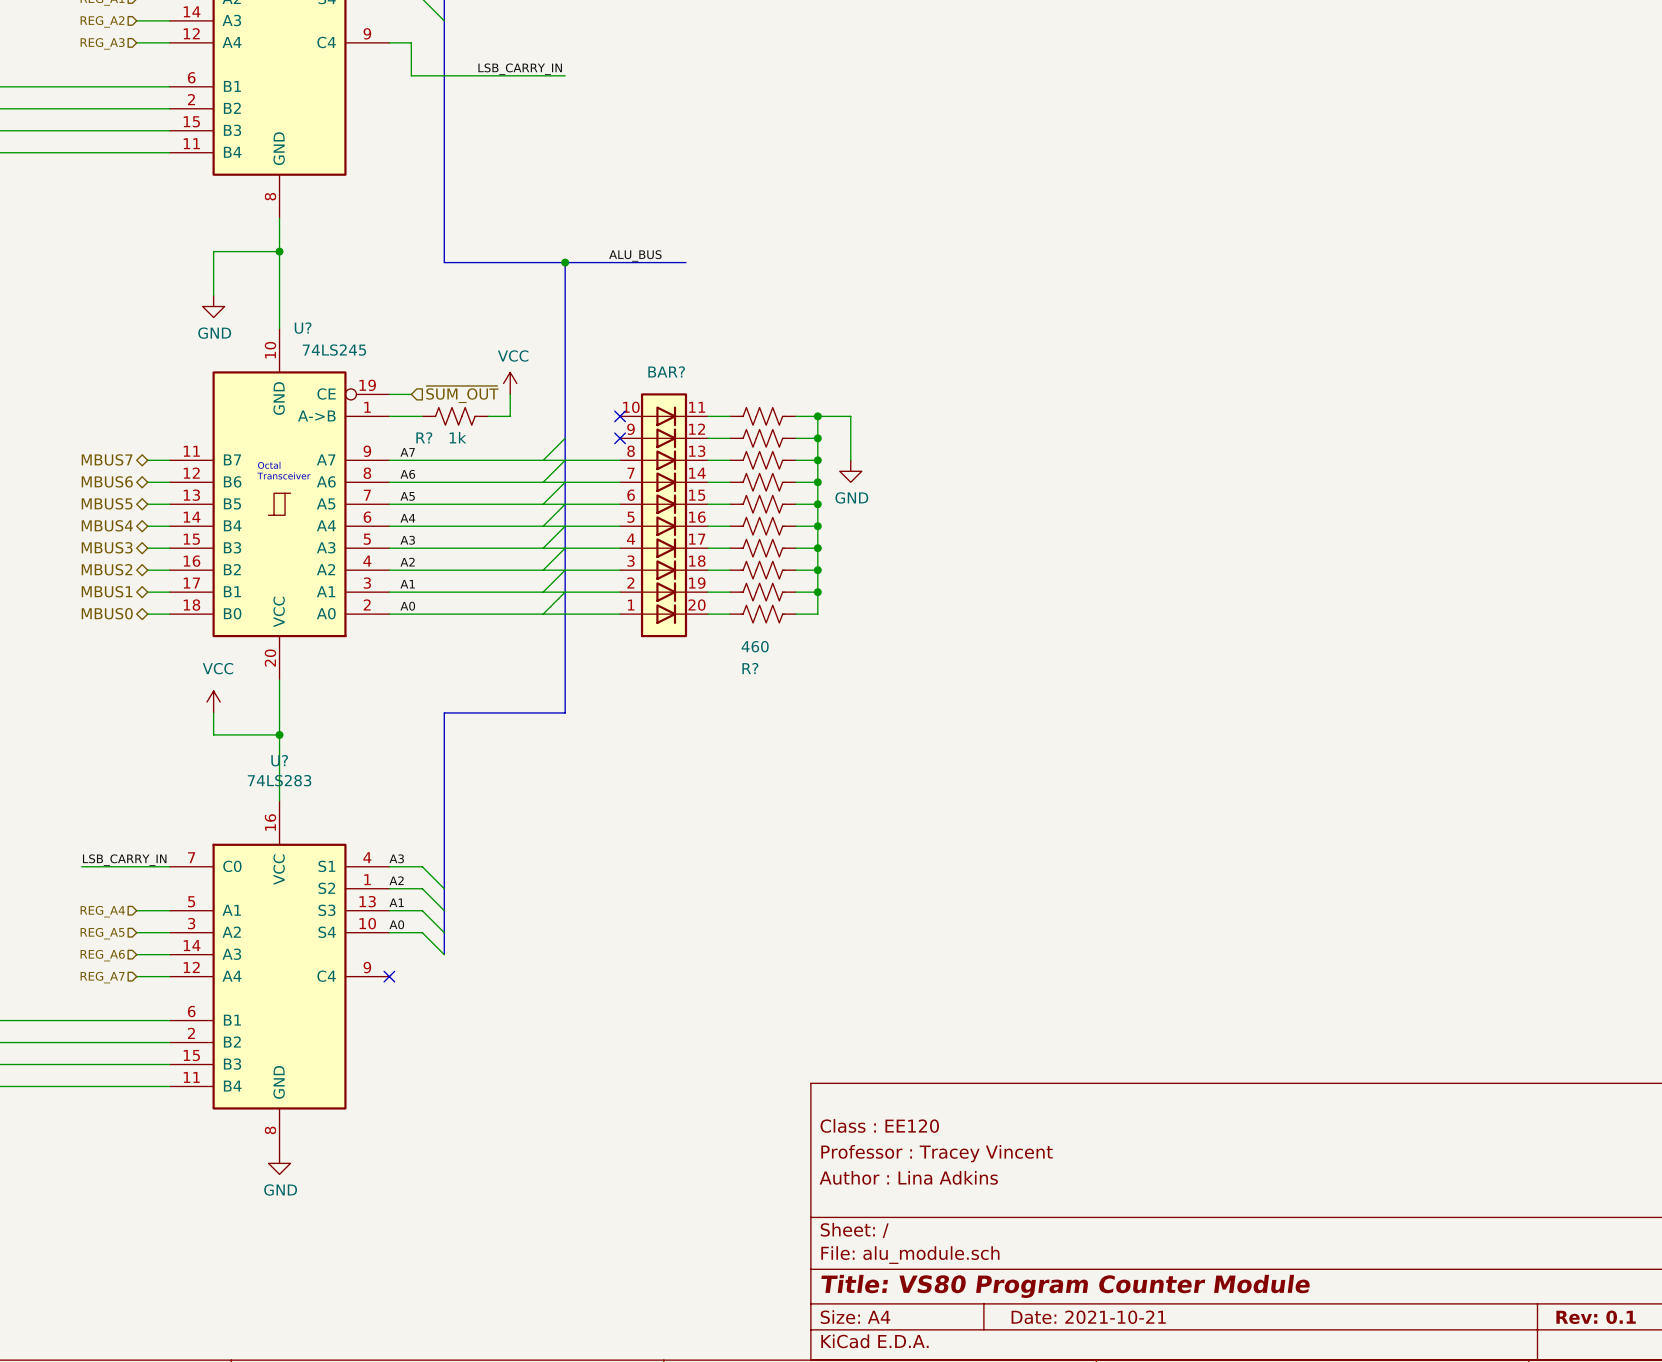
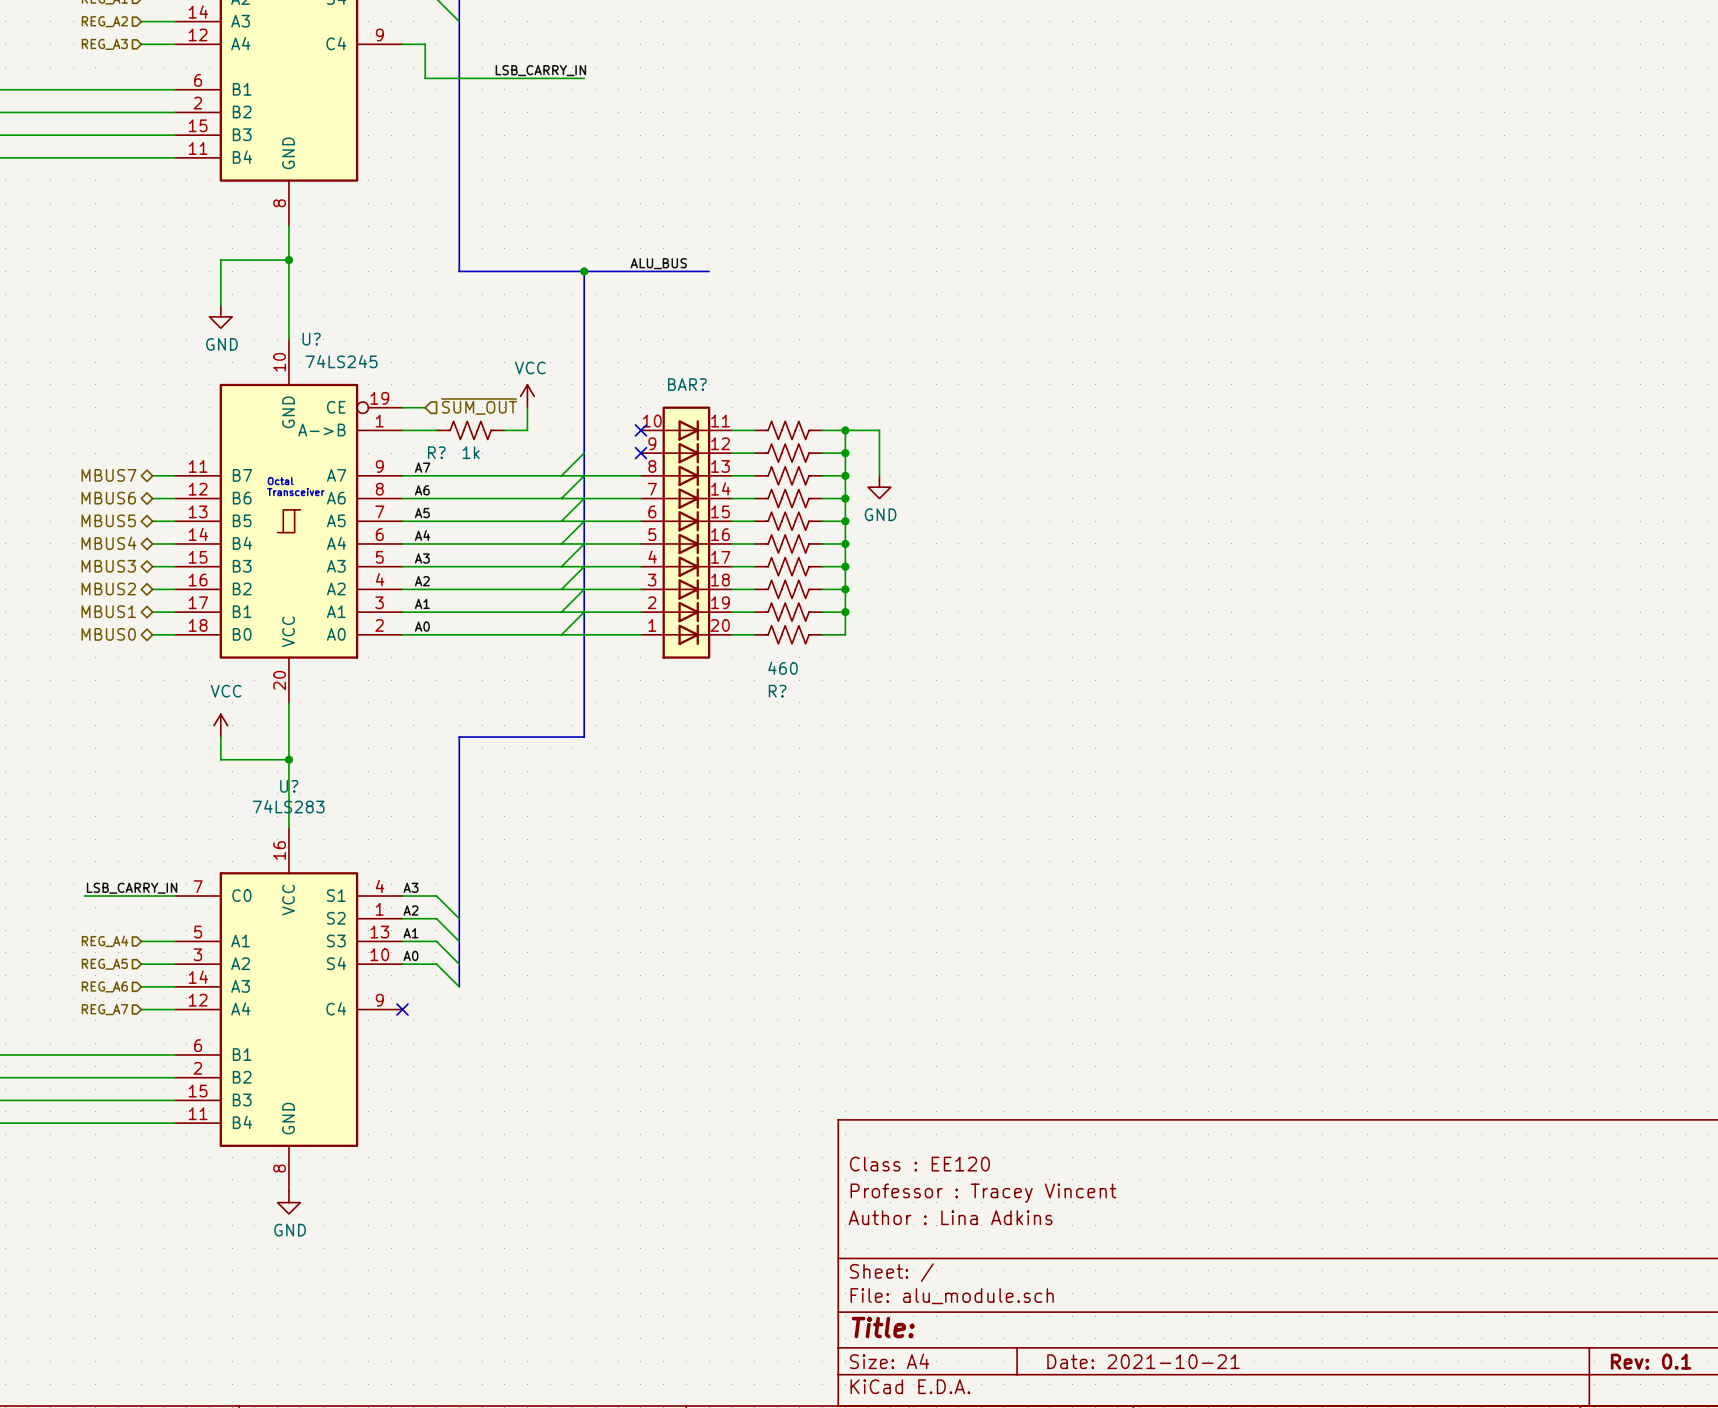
title block: Title: VS80 Program Counter Module (1065, 1286) -> Title: (883, 1327)

